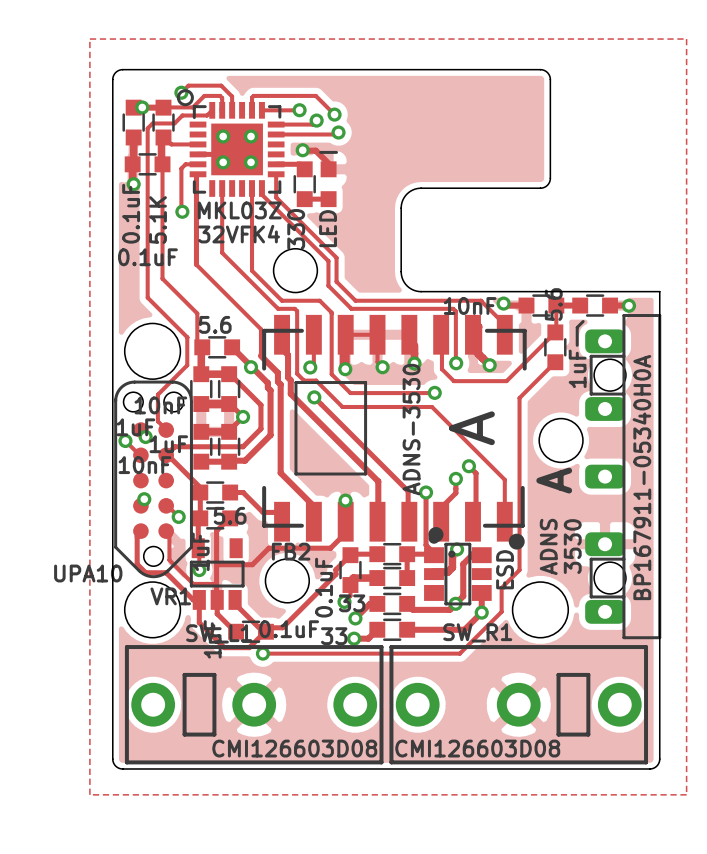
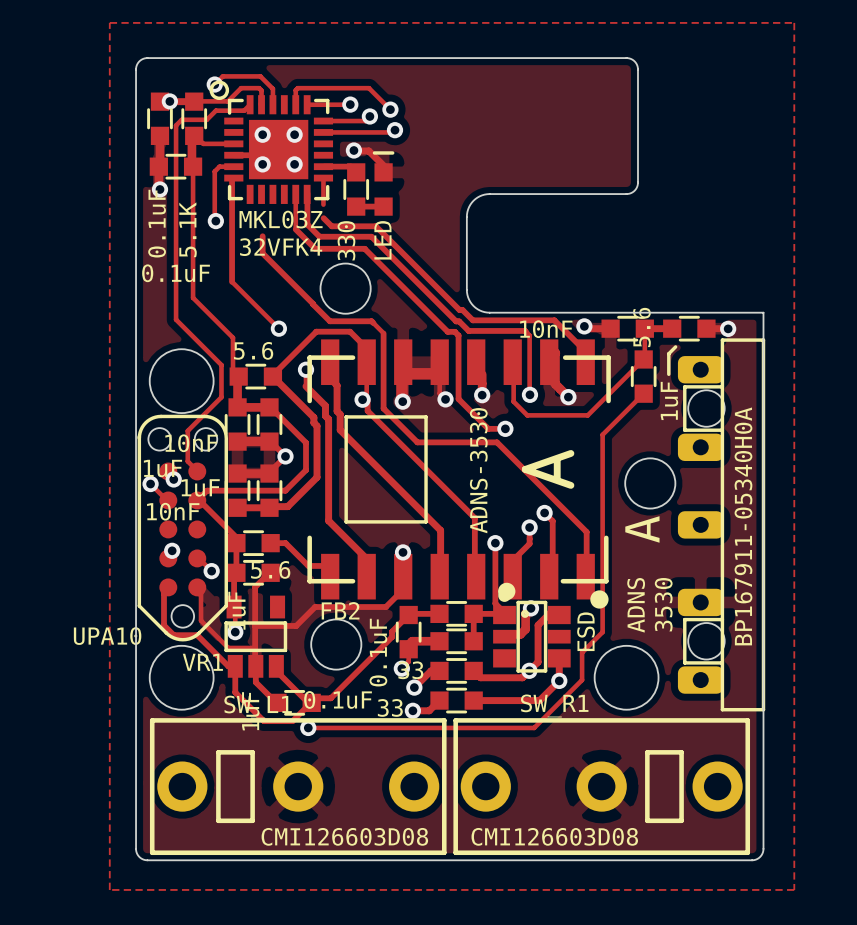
track: (222, 188) (222, 252) (278, 308) (294, 308) (297, 311) (297, 373) (303, 380) (316, 380) (342, 406) (432, 406) (504, 479) (504, 521) -> none
track: (261, 188) (261, 194) (328, 261) (328, 285) (351, 308) (453, 308) -> (307, 193) (307, 224) (319, 236) (371, 236) (456, 321) (459, 321) (468, 330) (526, 332)
track: (276, 197) (336, 257) (336, 281) (355, 300) (480, 300) (499, 319) (499, 323) -> none
track: none -> (323, 218) (331, 226) (375, 226) (459, 310) (462, 310) (472, 320) (554, 320) (586, 352)
track: (252, 219) (252, 270) (282, 300) (319, 300) -> (262, 236) (262, 253) (329, 321) (371, 321) (373, 323)
track: none -> (295, 229) (315, 248) (364, 248) (447, 331) (454, 331) (458, 335) (458, 399) (488, 428) (505, 428)
track: (237, 305) (260, 329) (260, 341) -> none
via: none -> (278, 328)
track: (328, 309) (331, 313) -> (383, 333) (383, 408) (417, 442) (497, 442) (586, 532) (586, 559)
track: (331, 313) (331, 374) (350, 393) (432, 393) -> none
track: none -> (363, 344) (350, 331) (316, 331) (272, 376)
track: (345, 334) (376, 335) -> none
track: none -> (409, 373) (438, 373)
via position: (251, 367) -> (306, 369)
track: (314, 397) (408, 491) -> (367, 399) (367, 410) (474, 518) (474, 541)
via: (314, 397) -> none

